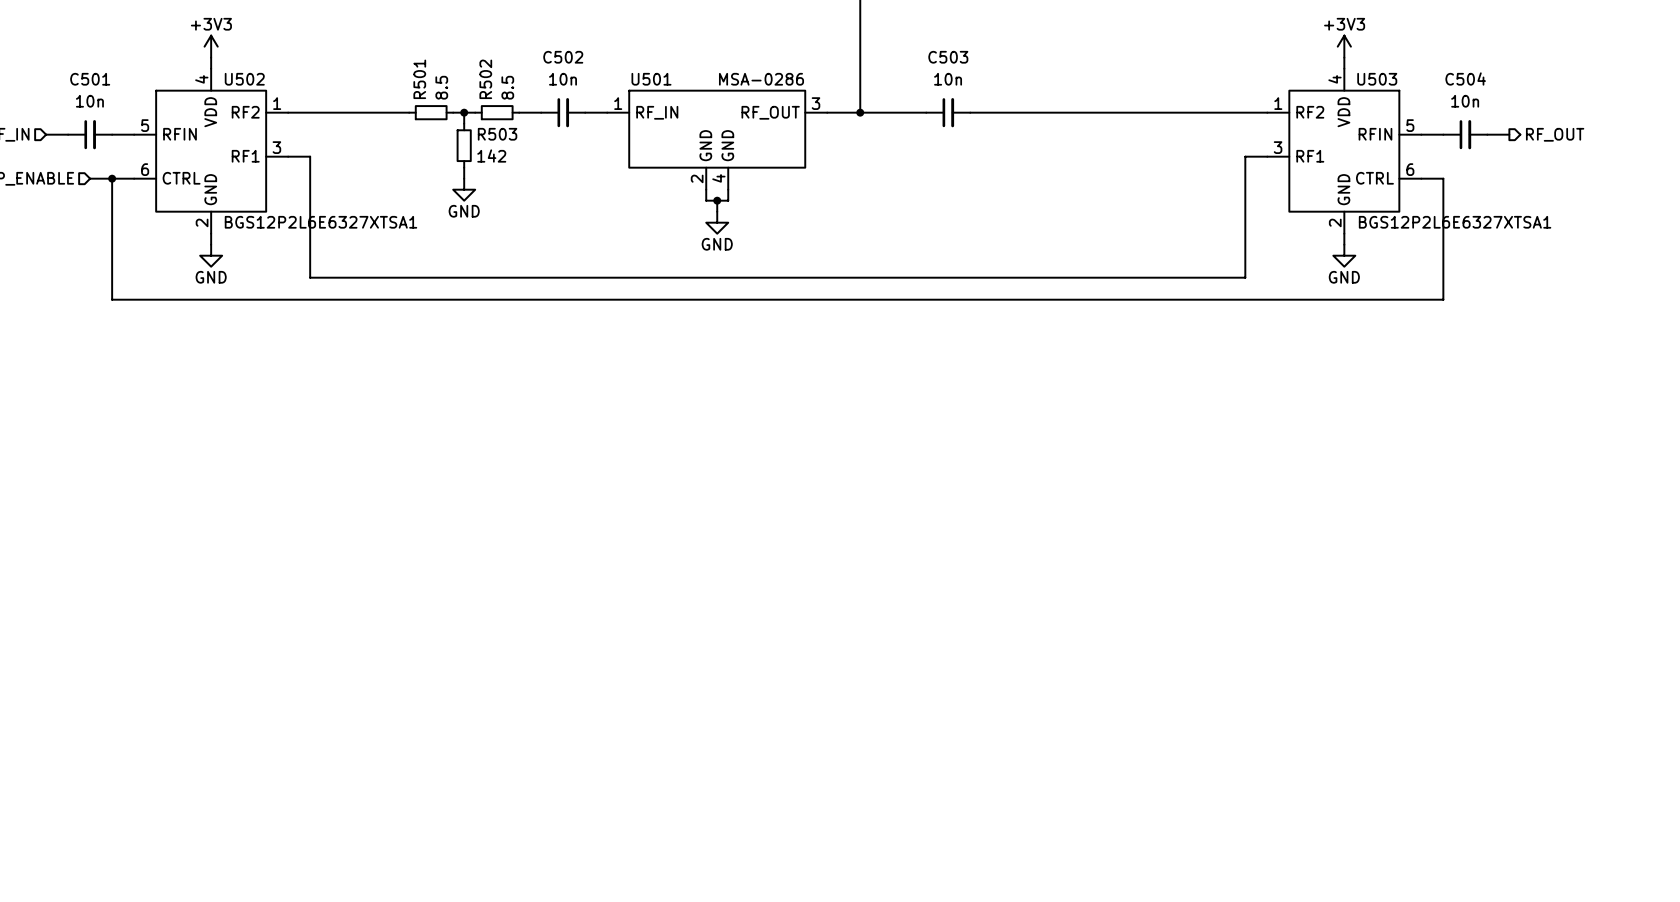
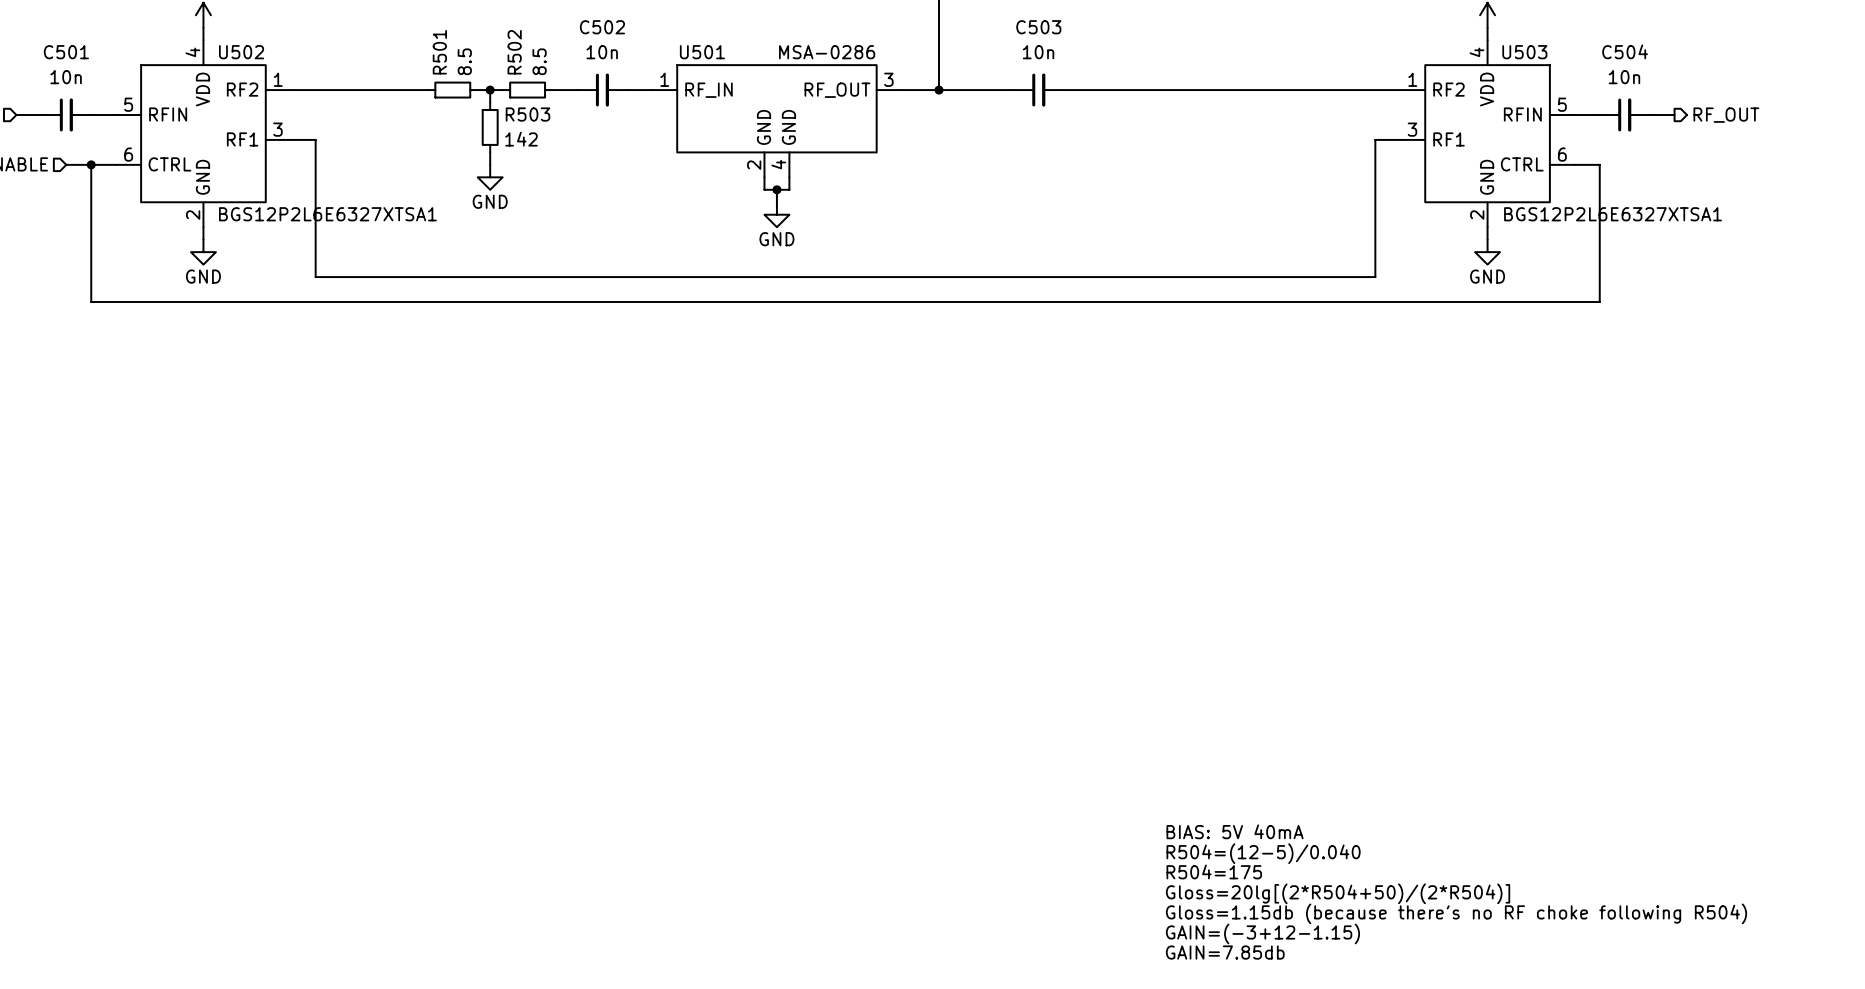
text: none -> BIAS: 5V 40mA (1235, 831)
text: none -> R504=(12-5)/0.040 (1263, 853)
text: none -> R504=175 (1214, 871)
text: none -> Gloss=20lg[(2*R504+50)/(2*R504)] (1338, 893)
text: none -> Gloss=1.15db (because there's no RF choke following R504) (1456, 913)
text: none -> GAIN=(-3+12-1.15) (1262, 933)
text: none -> GAIN=7.85db (1225, 952)

